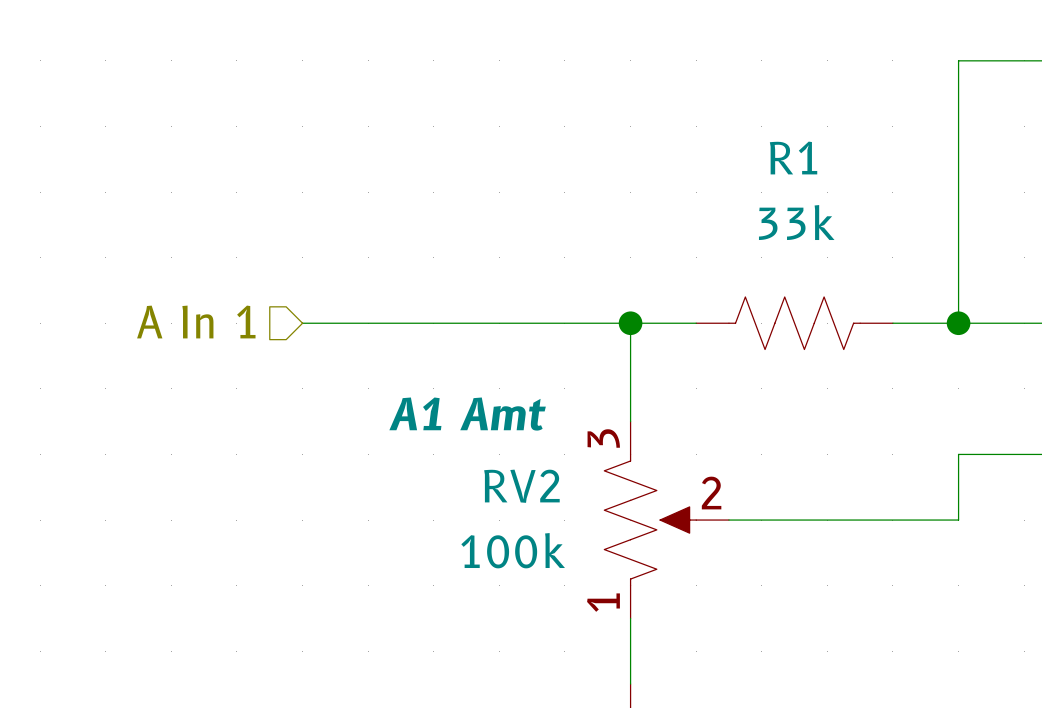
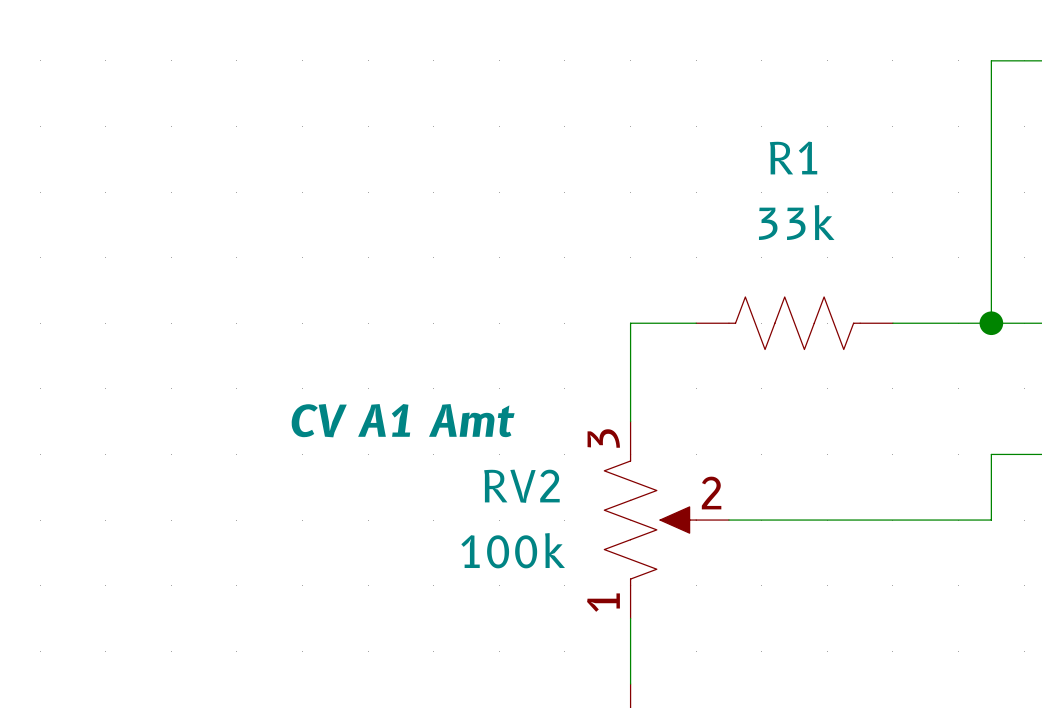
wire: (991, 60) (958, 60) (958, 323) -> (991, 60) (991, 323)
hierarchical label: A In 1 (196, 322) -> none
wire: (302, 323) (630, 323) -> none
junction: (630, 323) -> none
junction position: (958, 323) -> (991, 323)
RV2 text: A1 Amt (467, 414) -> CV A1 Amt (403, 420)
wire: (991, 454) (958, 454) (958, 520) -> (991, 454) (991, 520) (958, 520)

